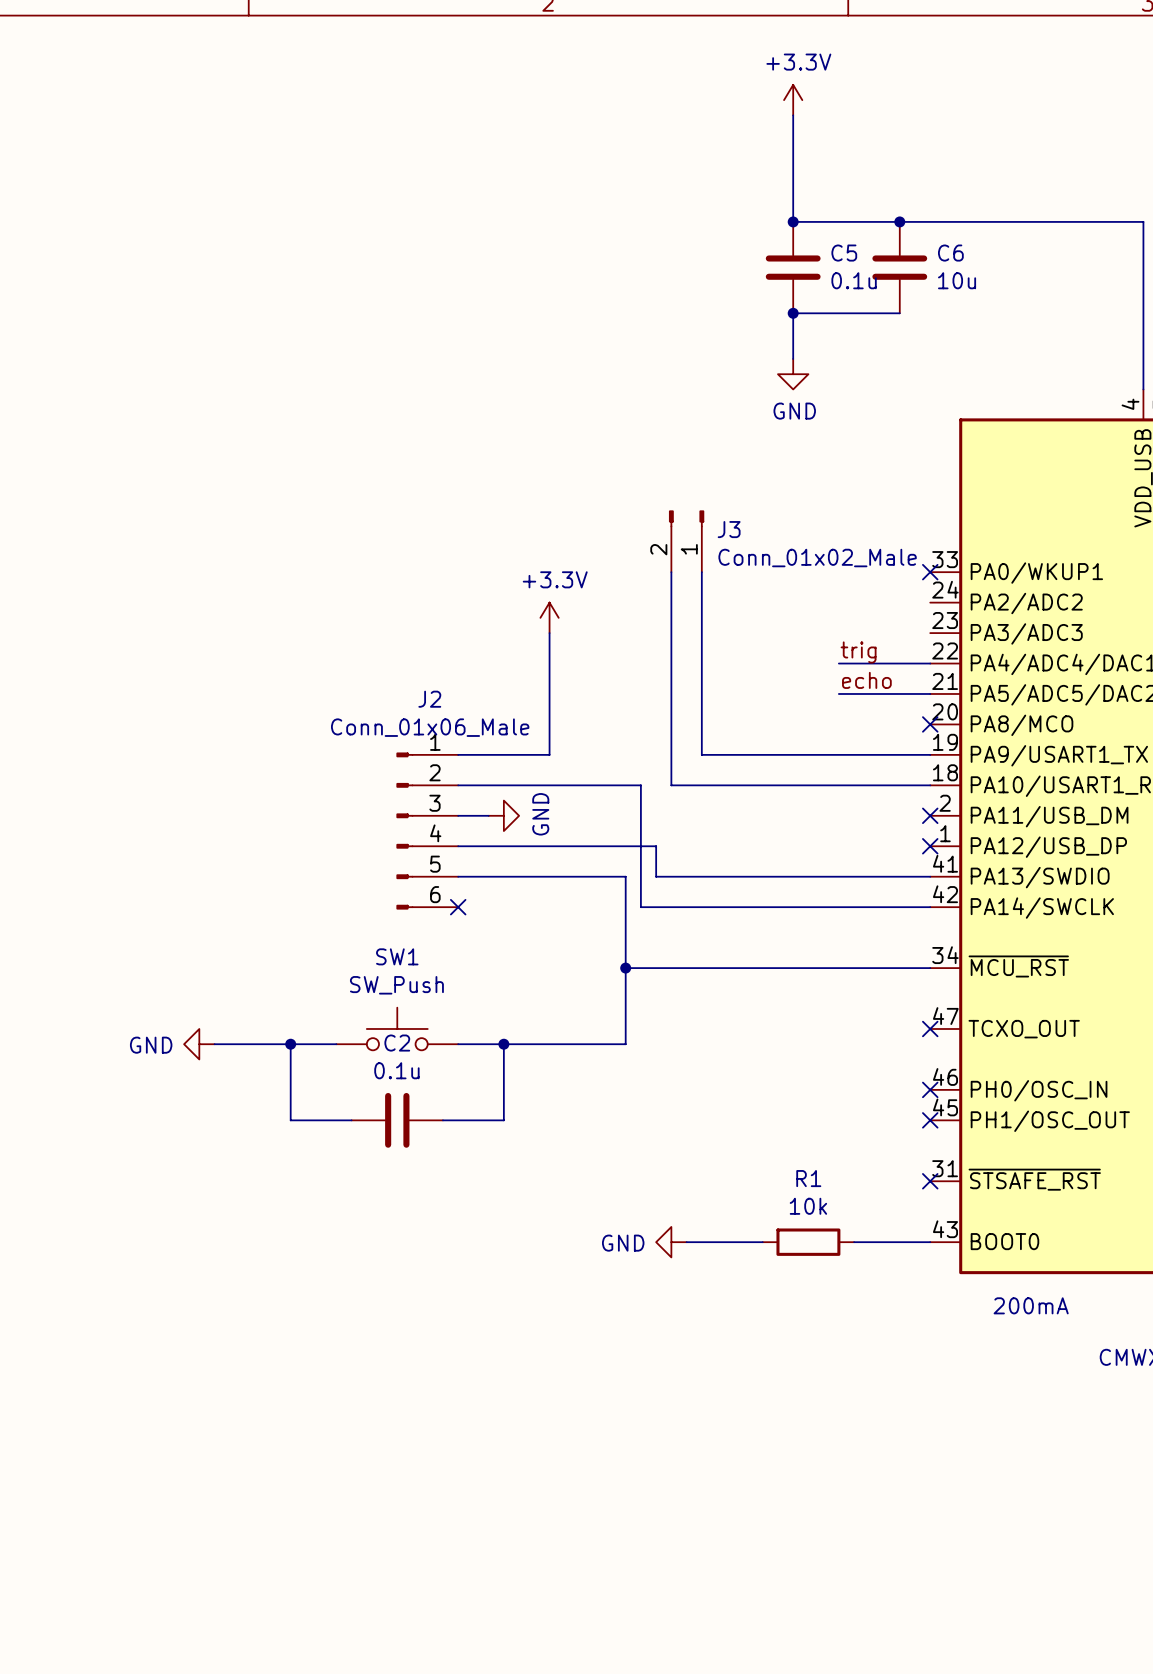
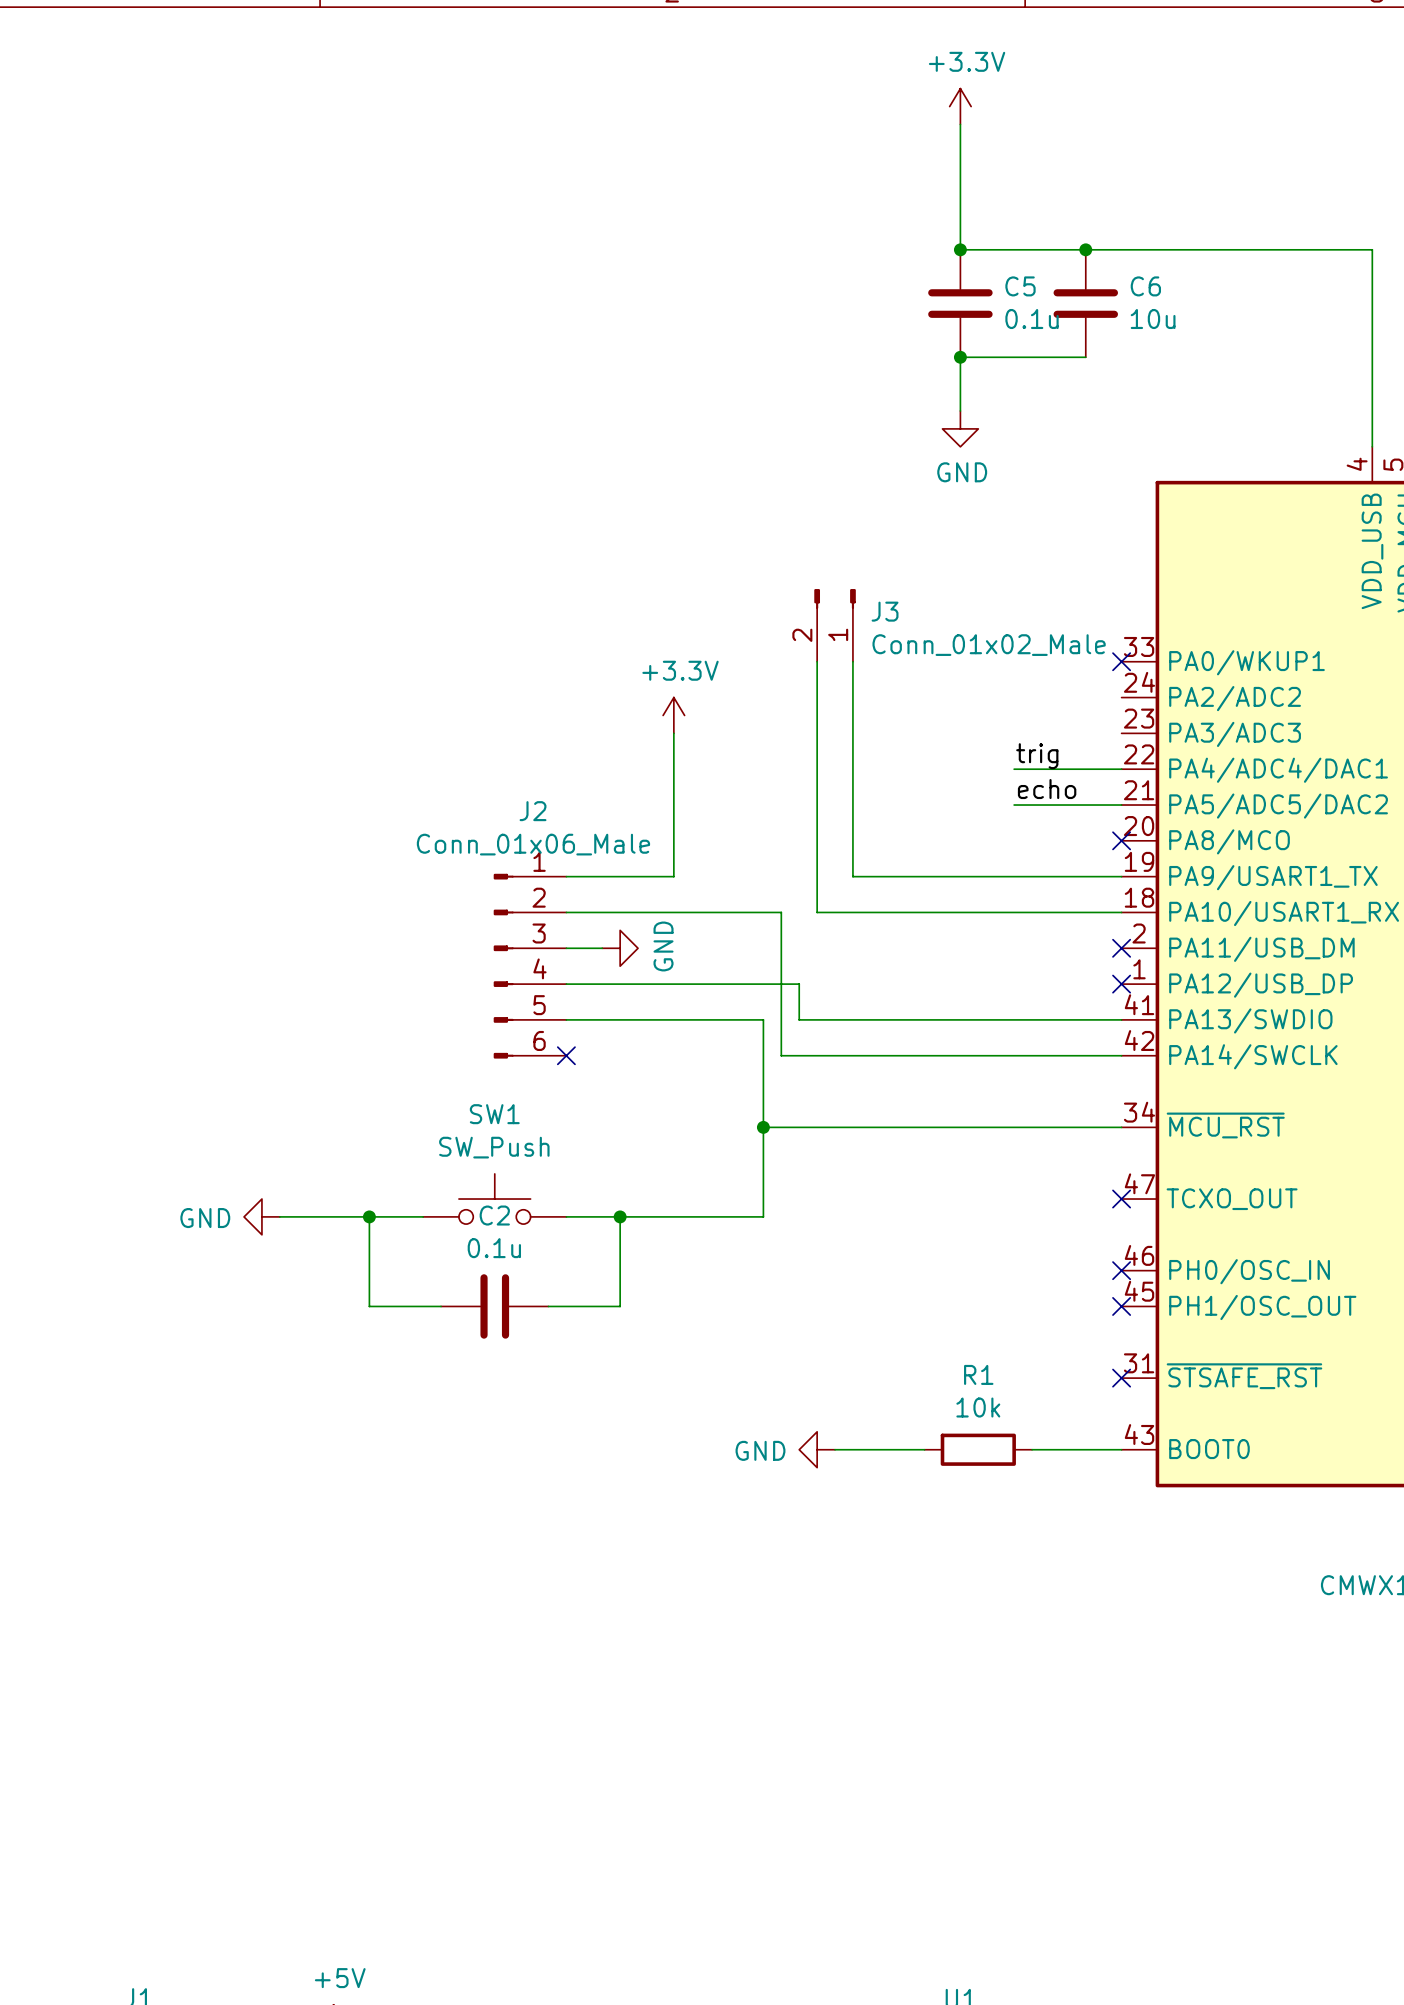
text: 200mA (1031, 1305) -> none

